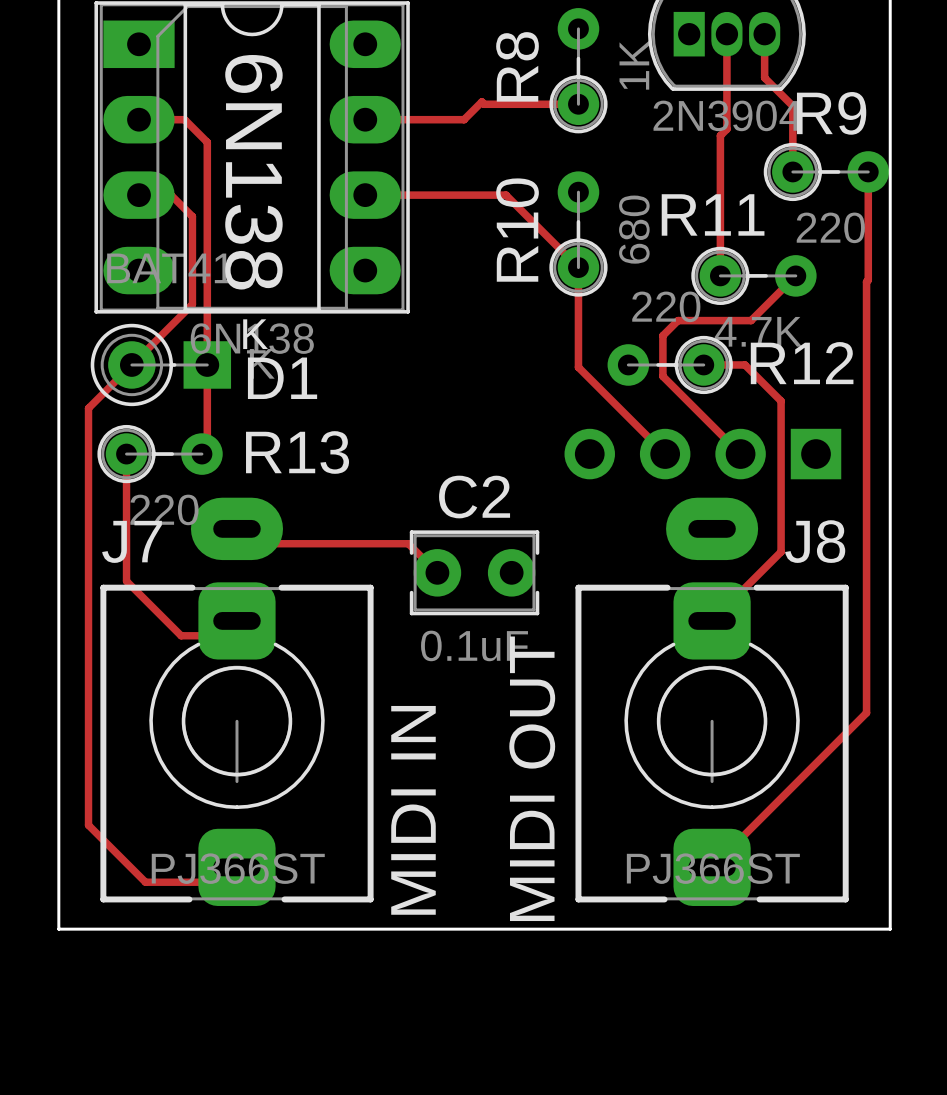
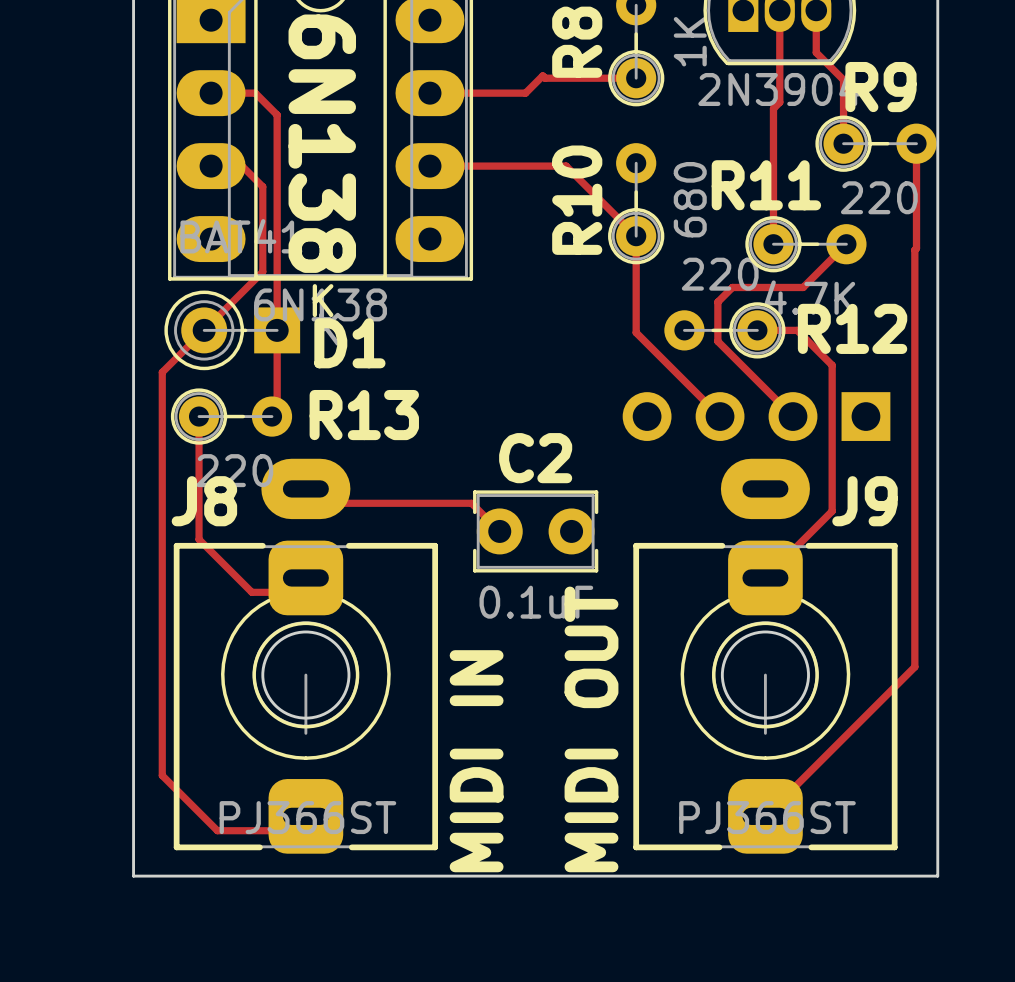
J7 name: J7 (132, 541) -> J8 (204, 501)
J8 name: J8 (815, 541) -> J9 (865, 501)
round board edge: none -> [261, 630, 351, 720]
round board edge: none -> [720, 630, 810, 720]

